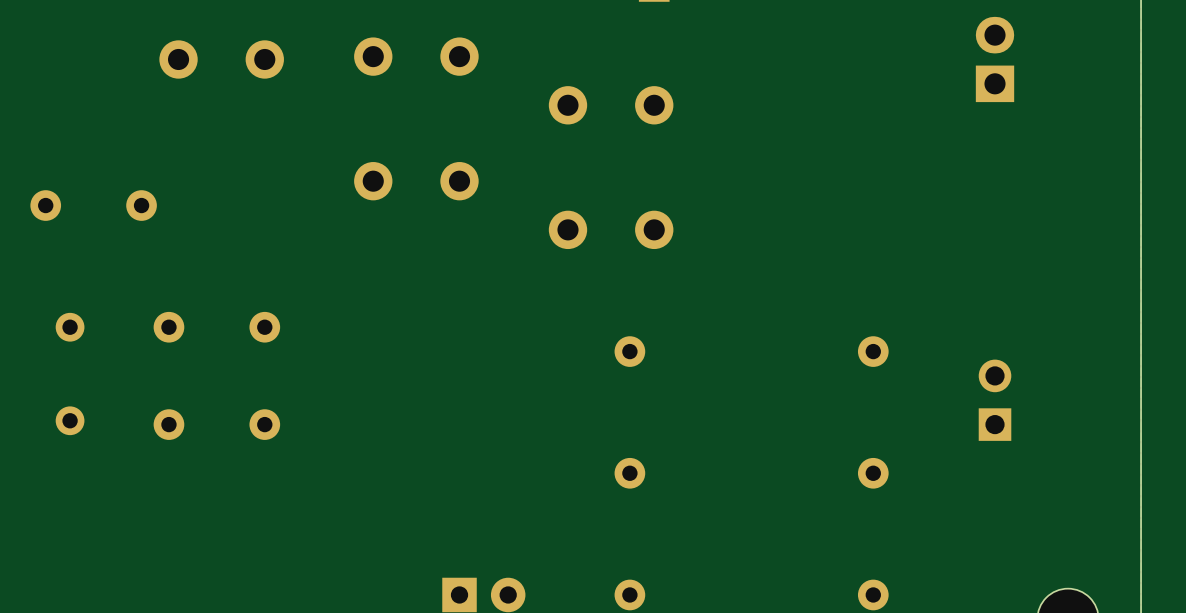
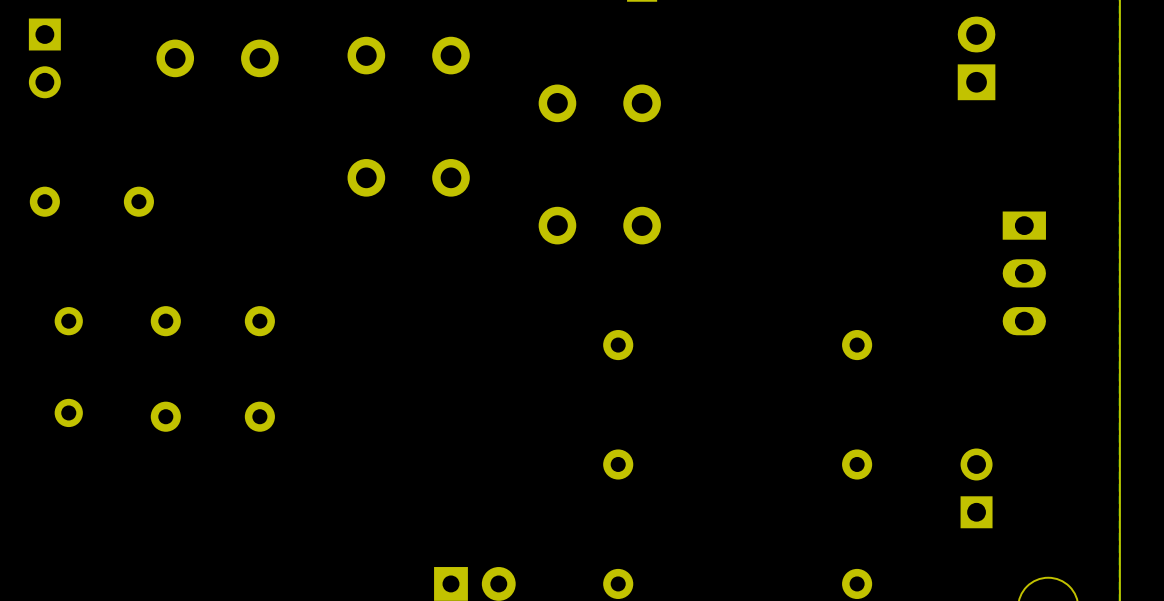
part: none -> (44, 58)
part: none -> (1024, 273)
part position: (995, 400) -> (976, 488)

